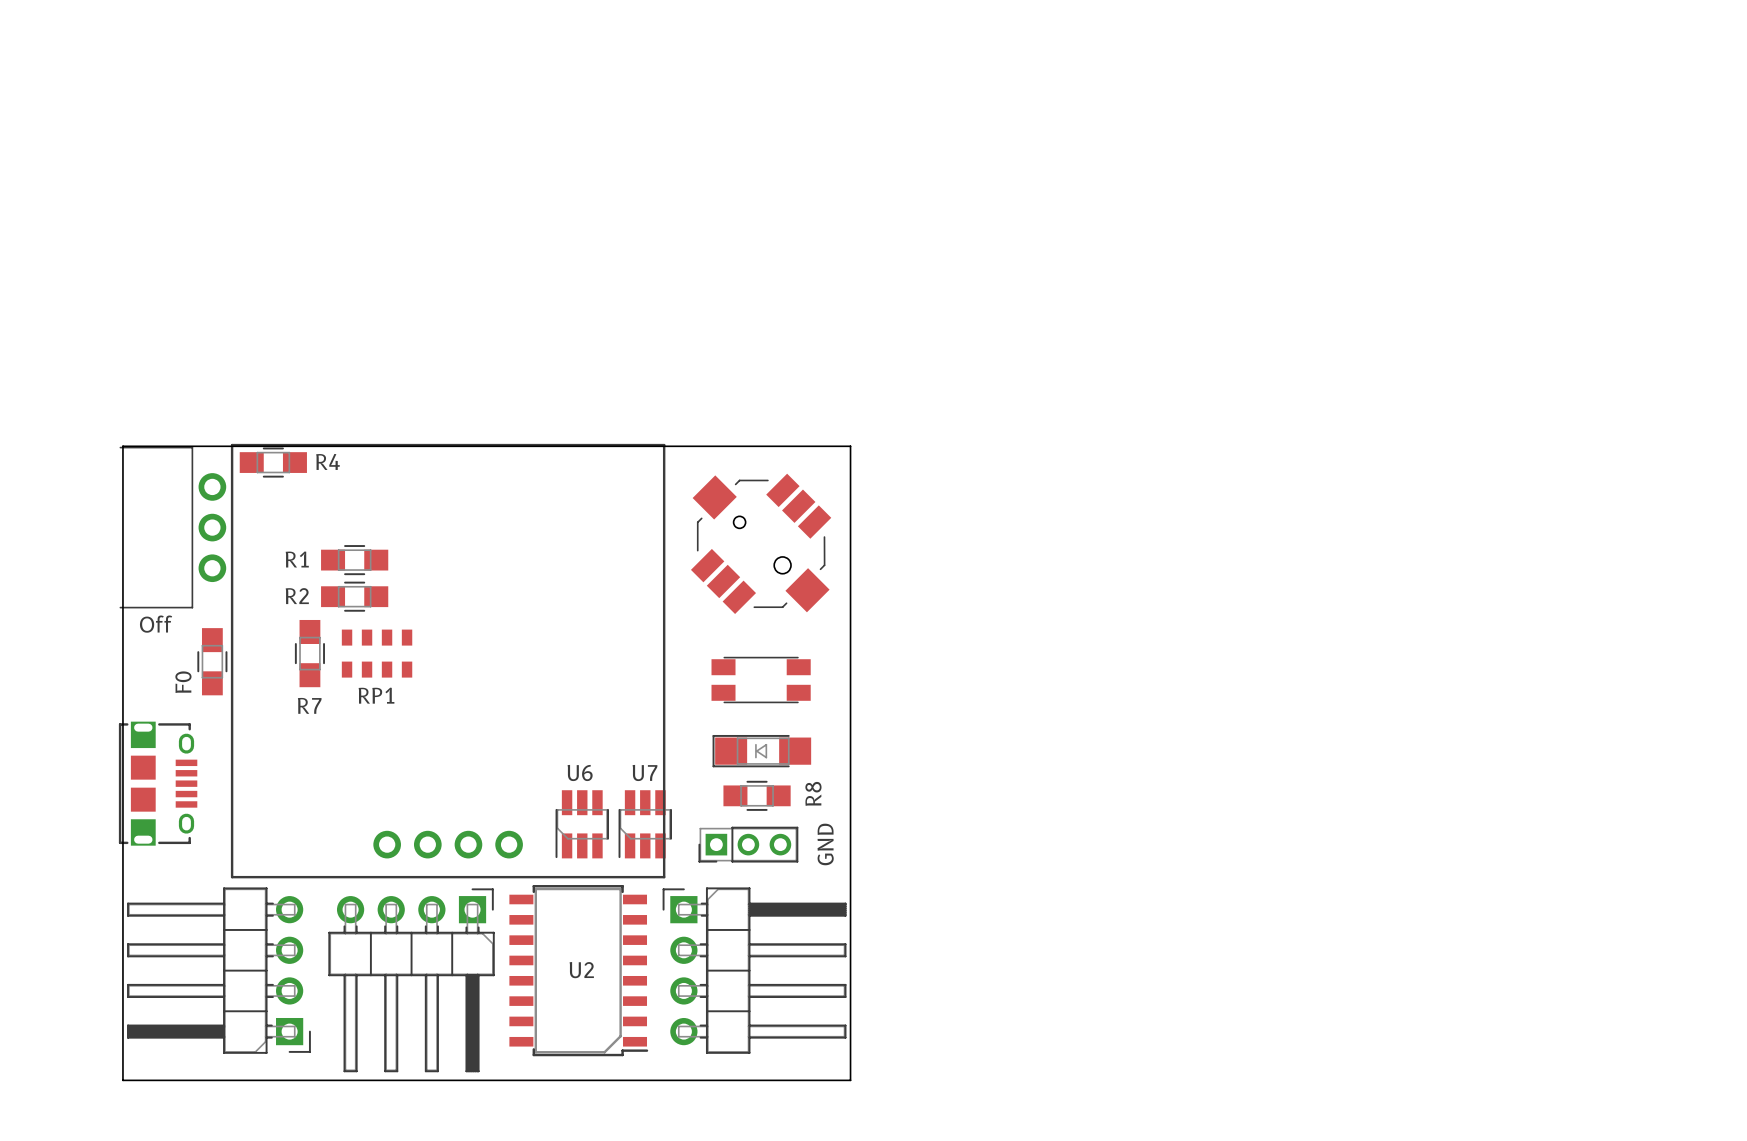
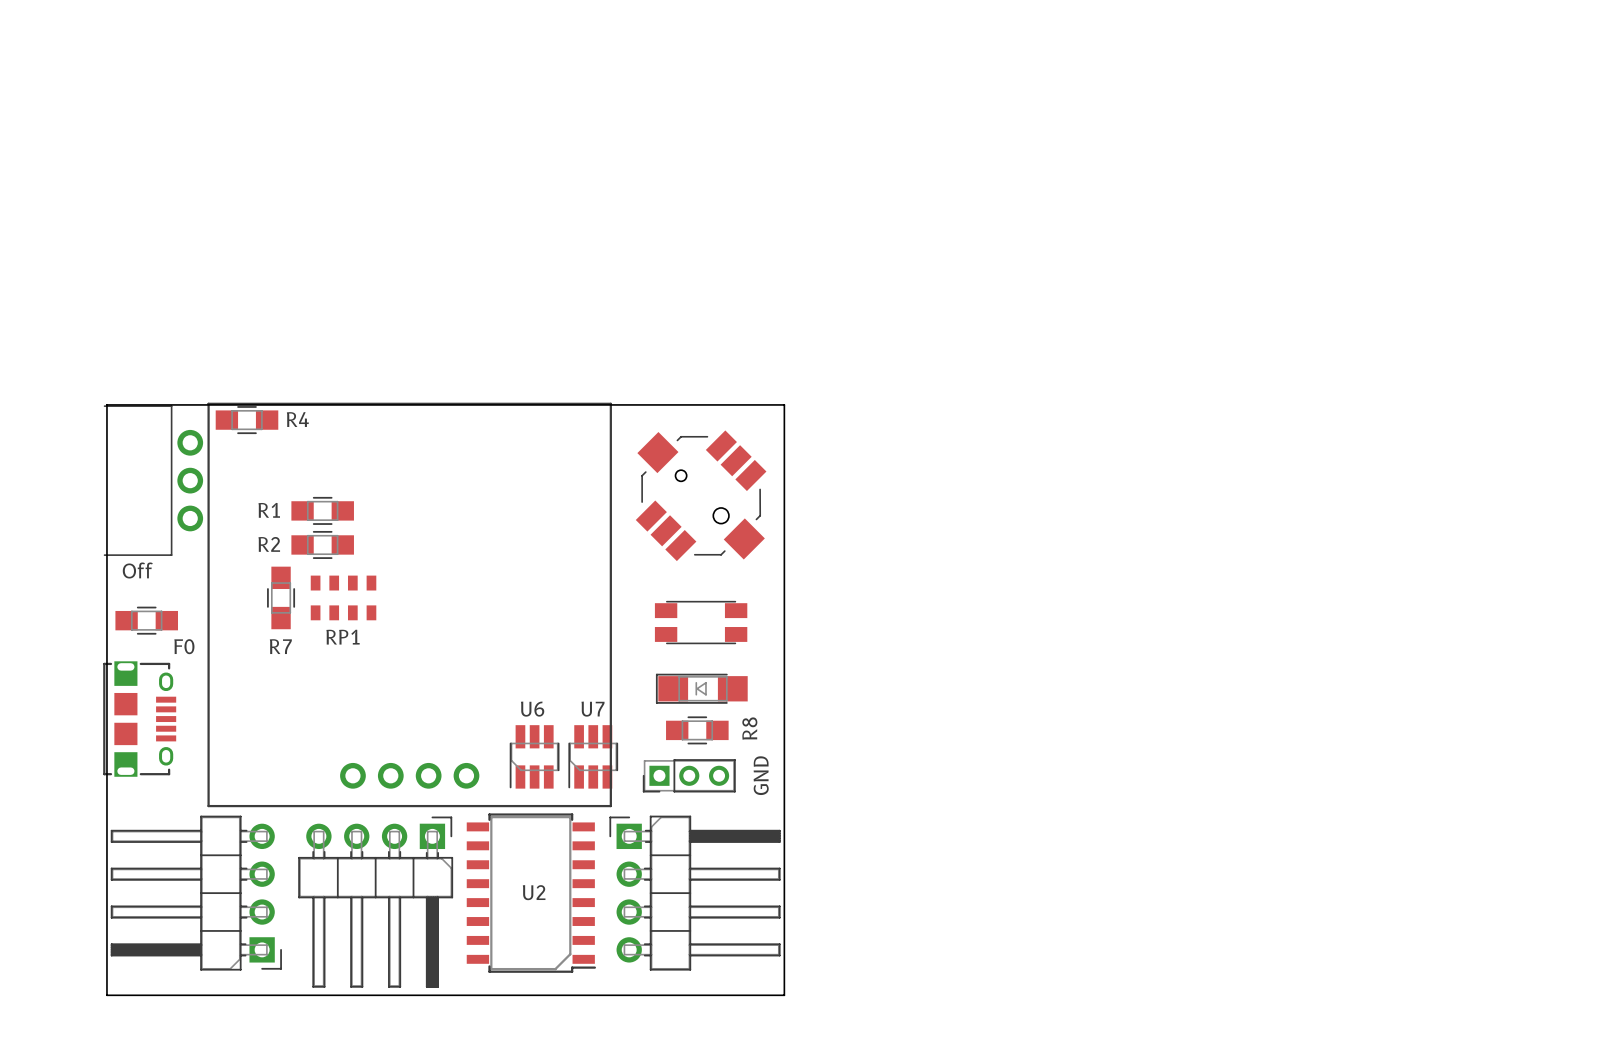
F0 rotation: 0° (212, 661) -> 90° clockwise (146, 620)
F0 position: (212, 661) -> (146, 620)
F0 name position: F0 (183, 682) -> F0 (184, 646)

